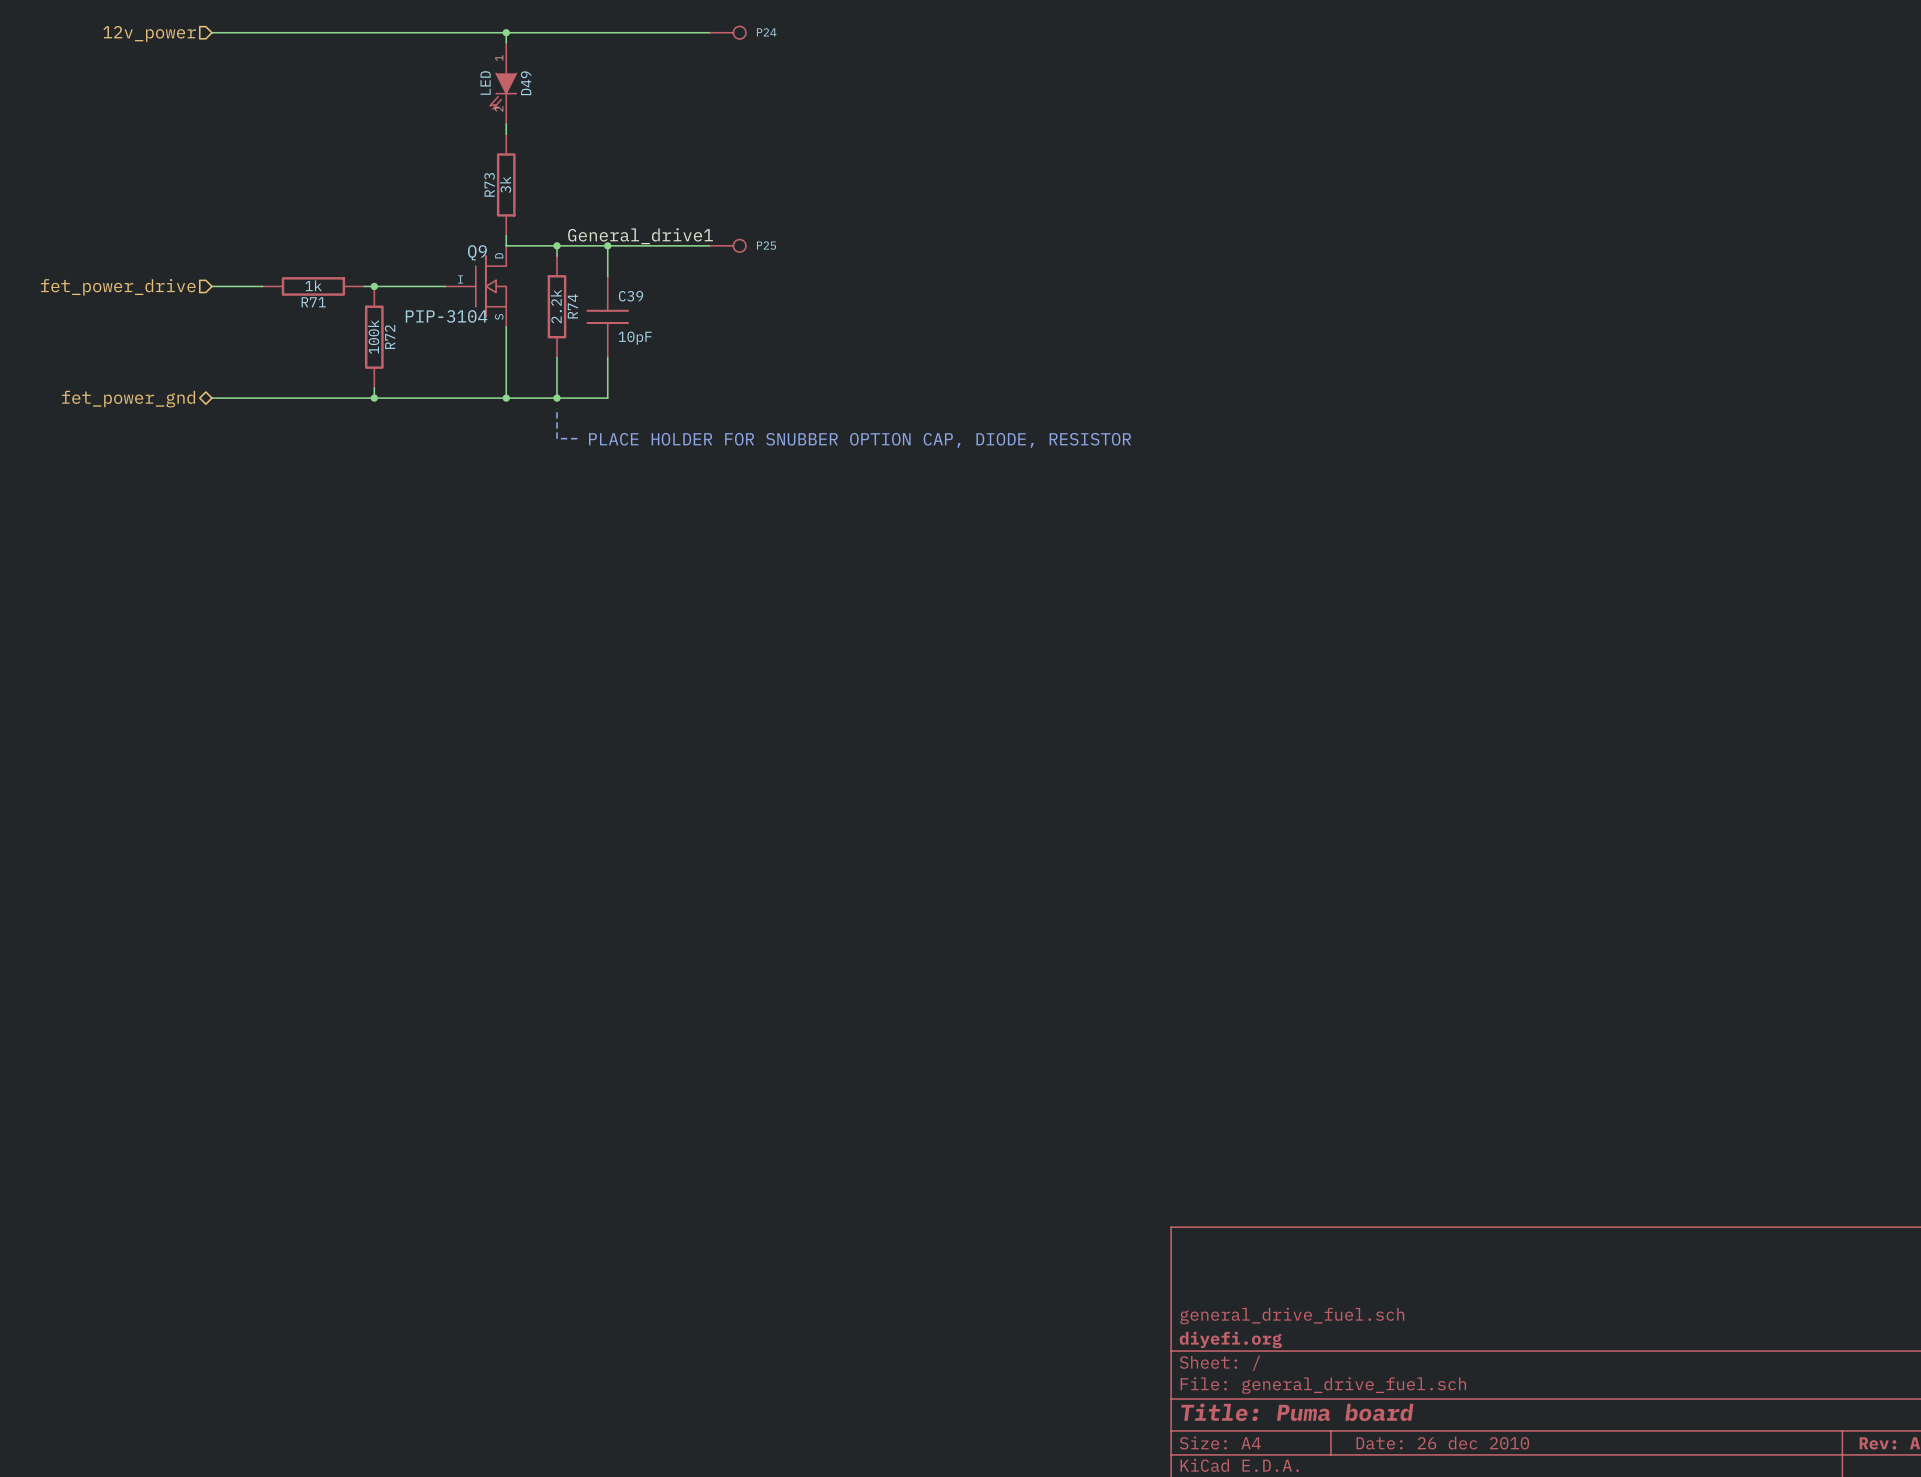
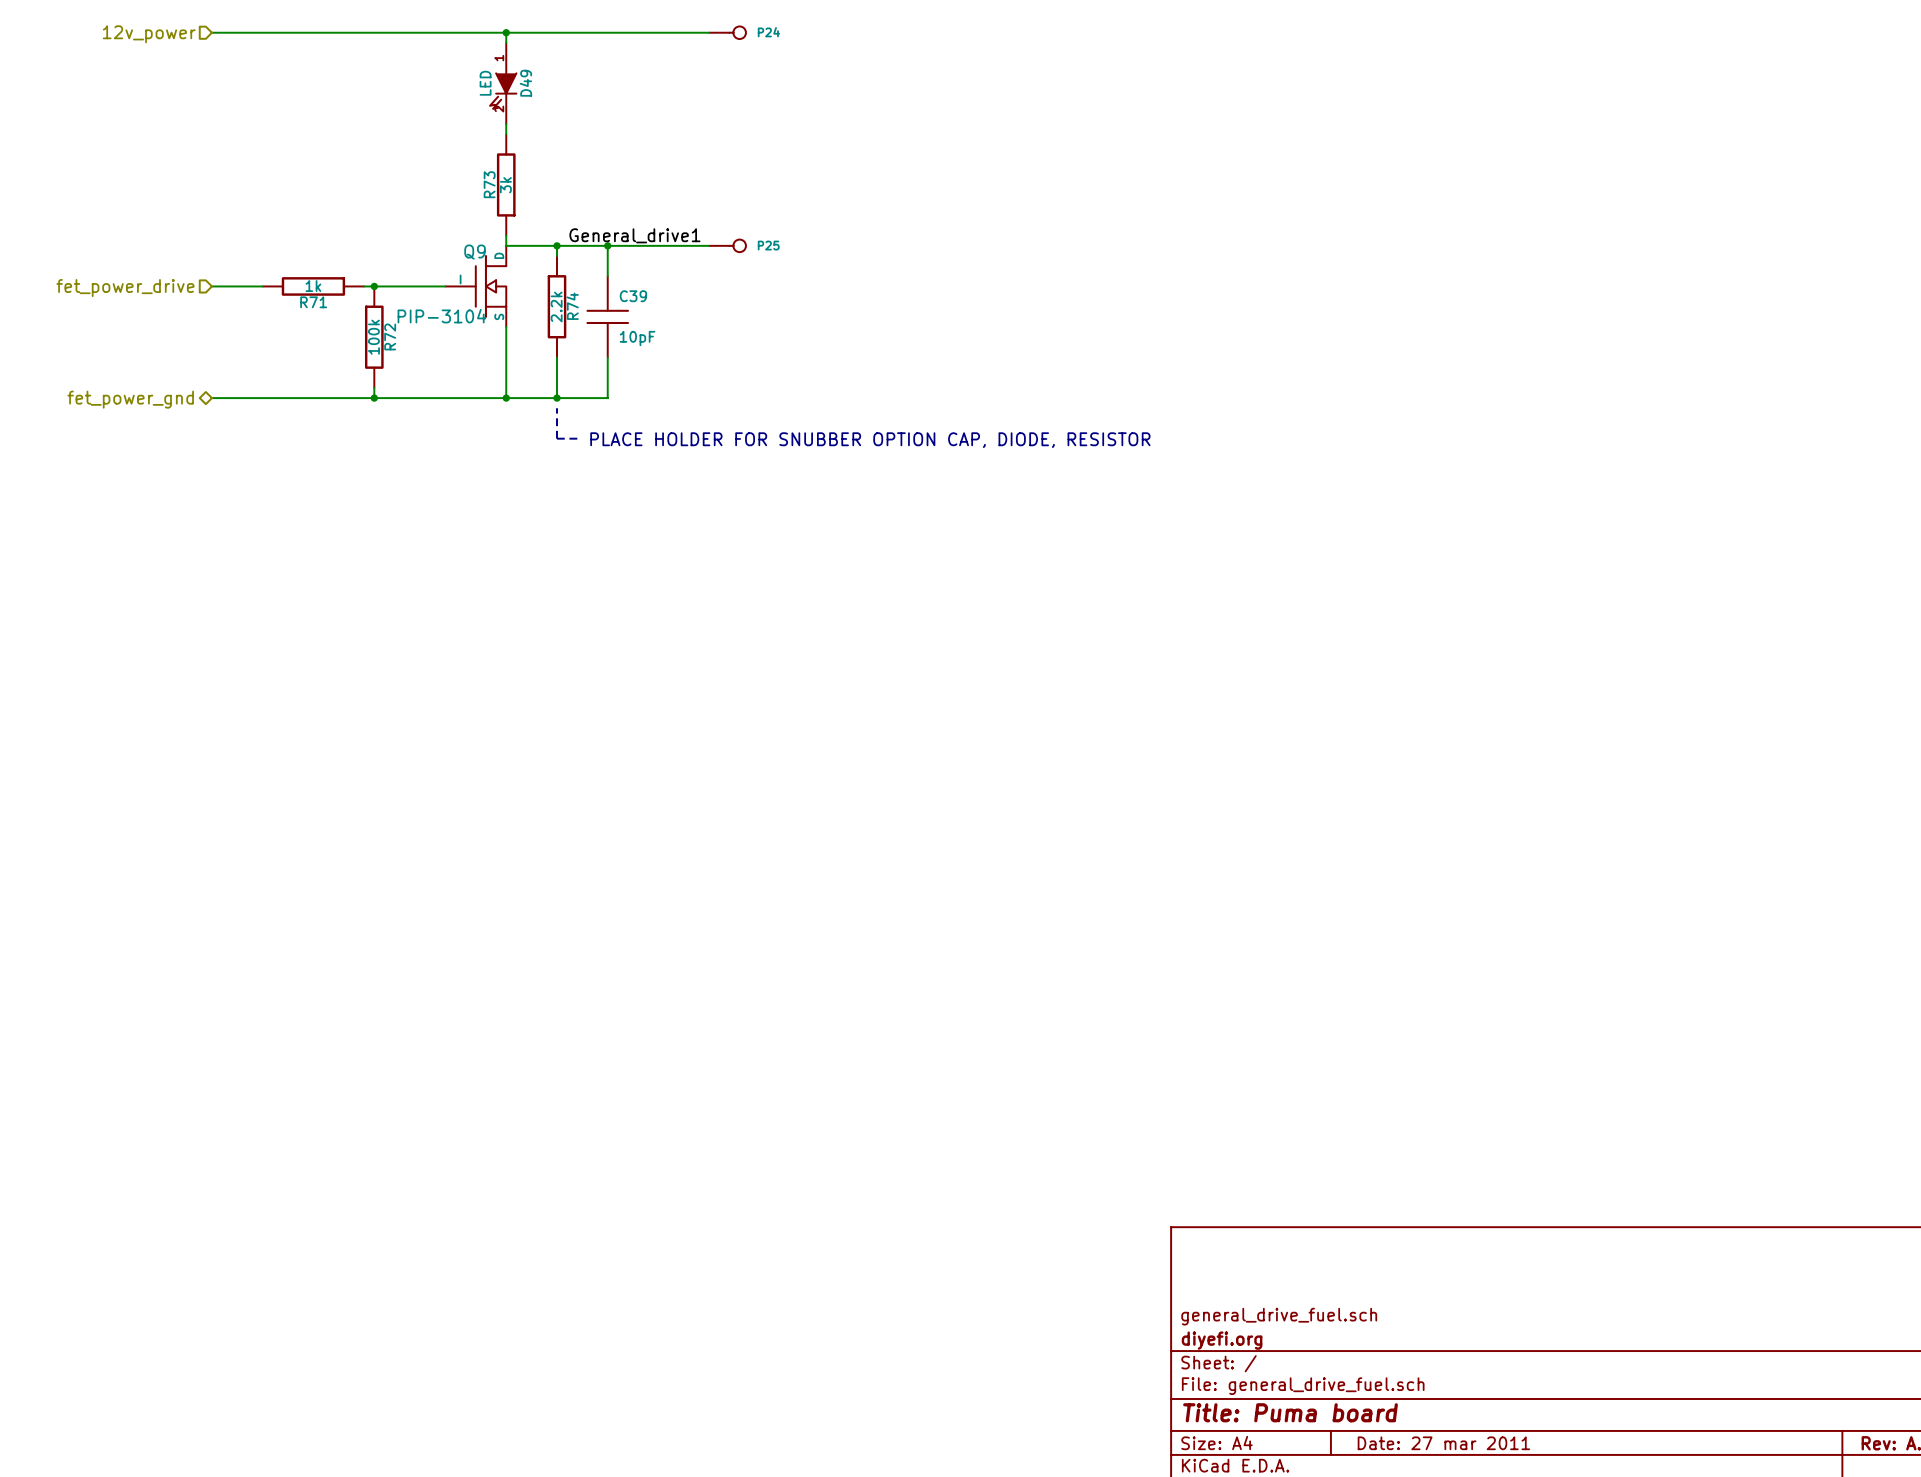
title block: Date: 26 dec 2010 (1442, 1443) -> Date: 27 mar 2011 (1443, 1443)

